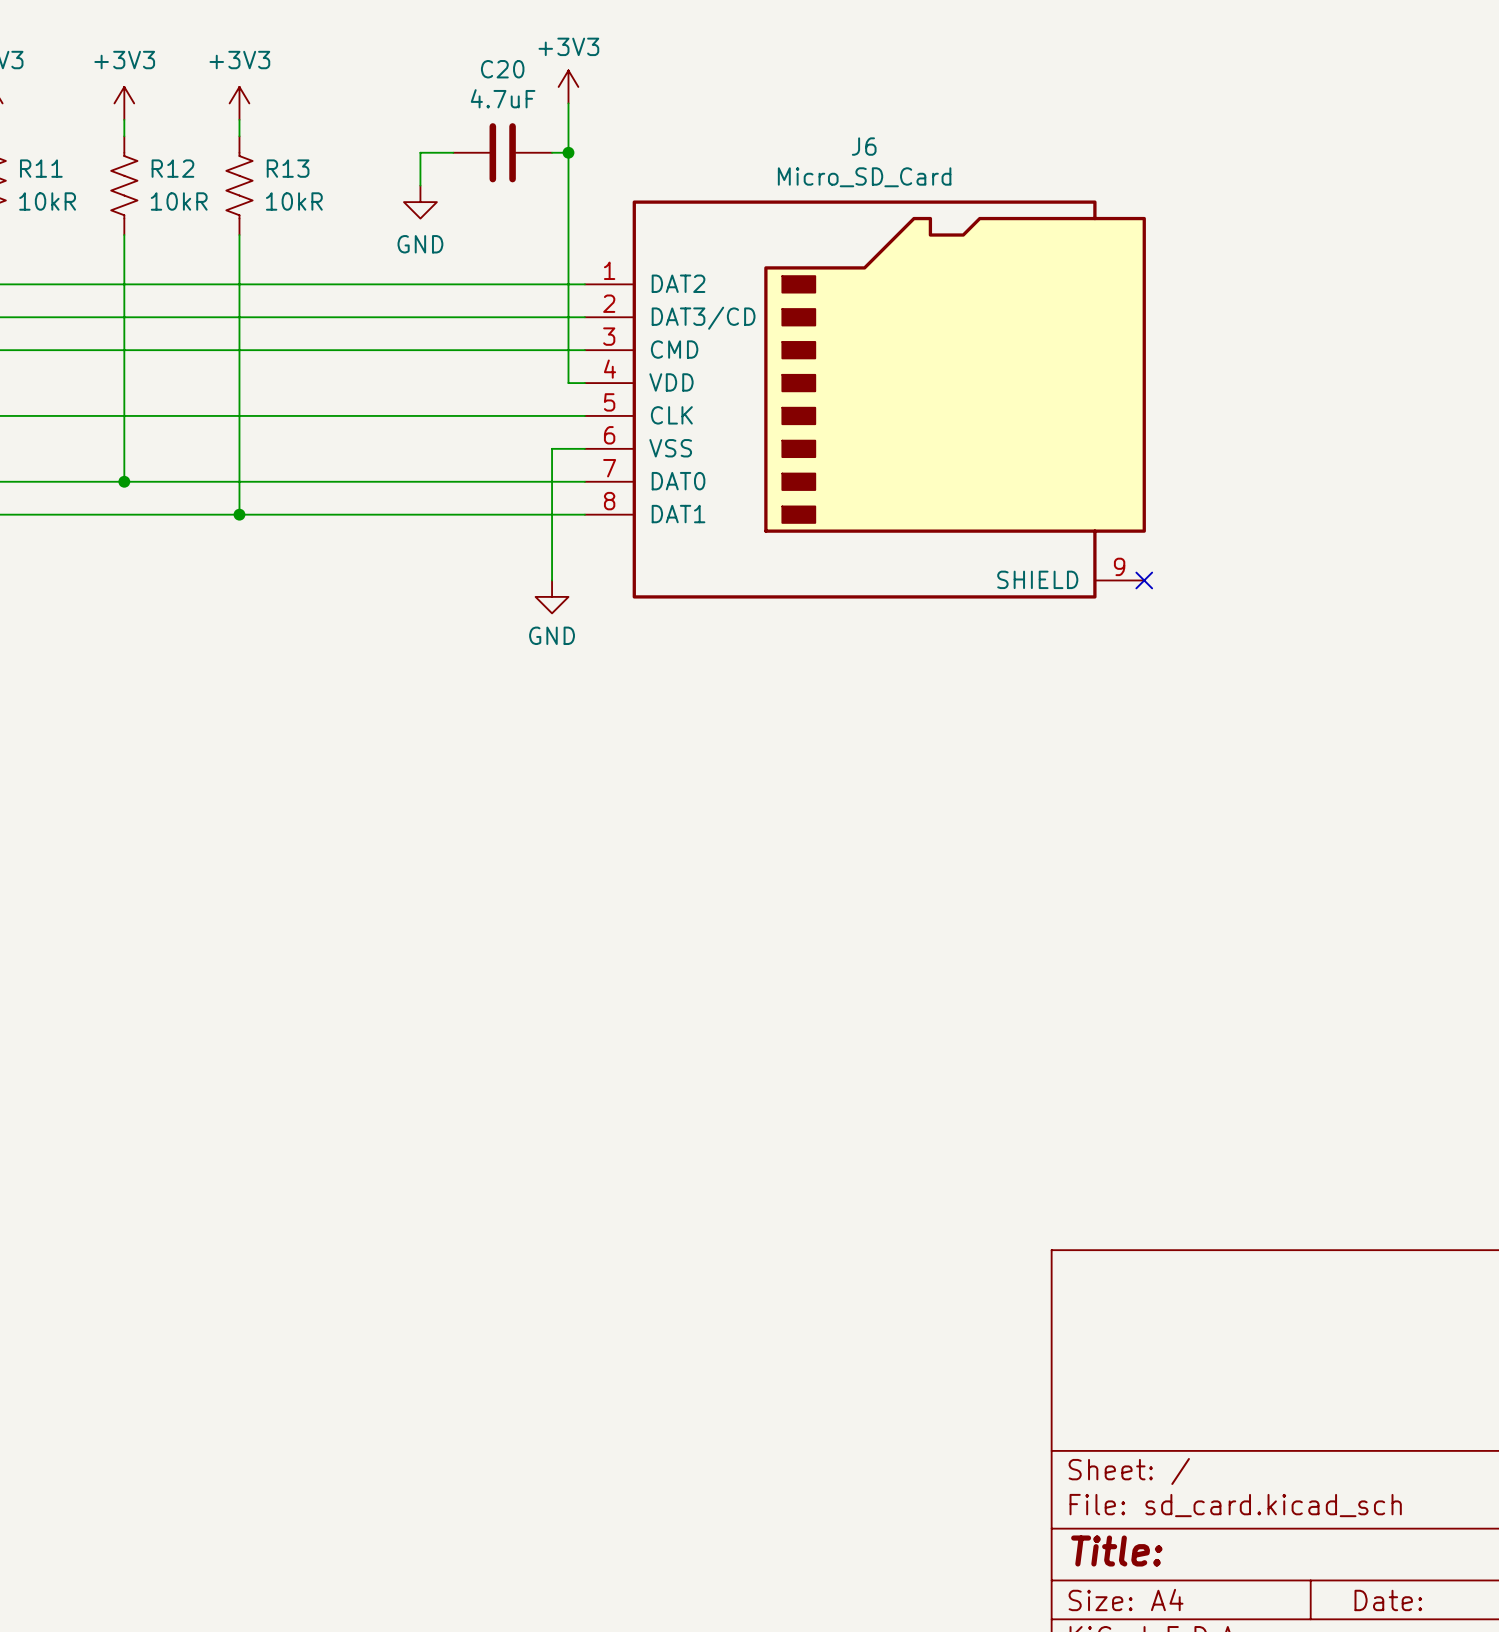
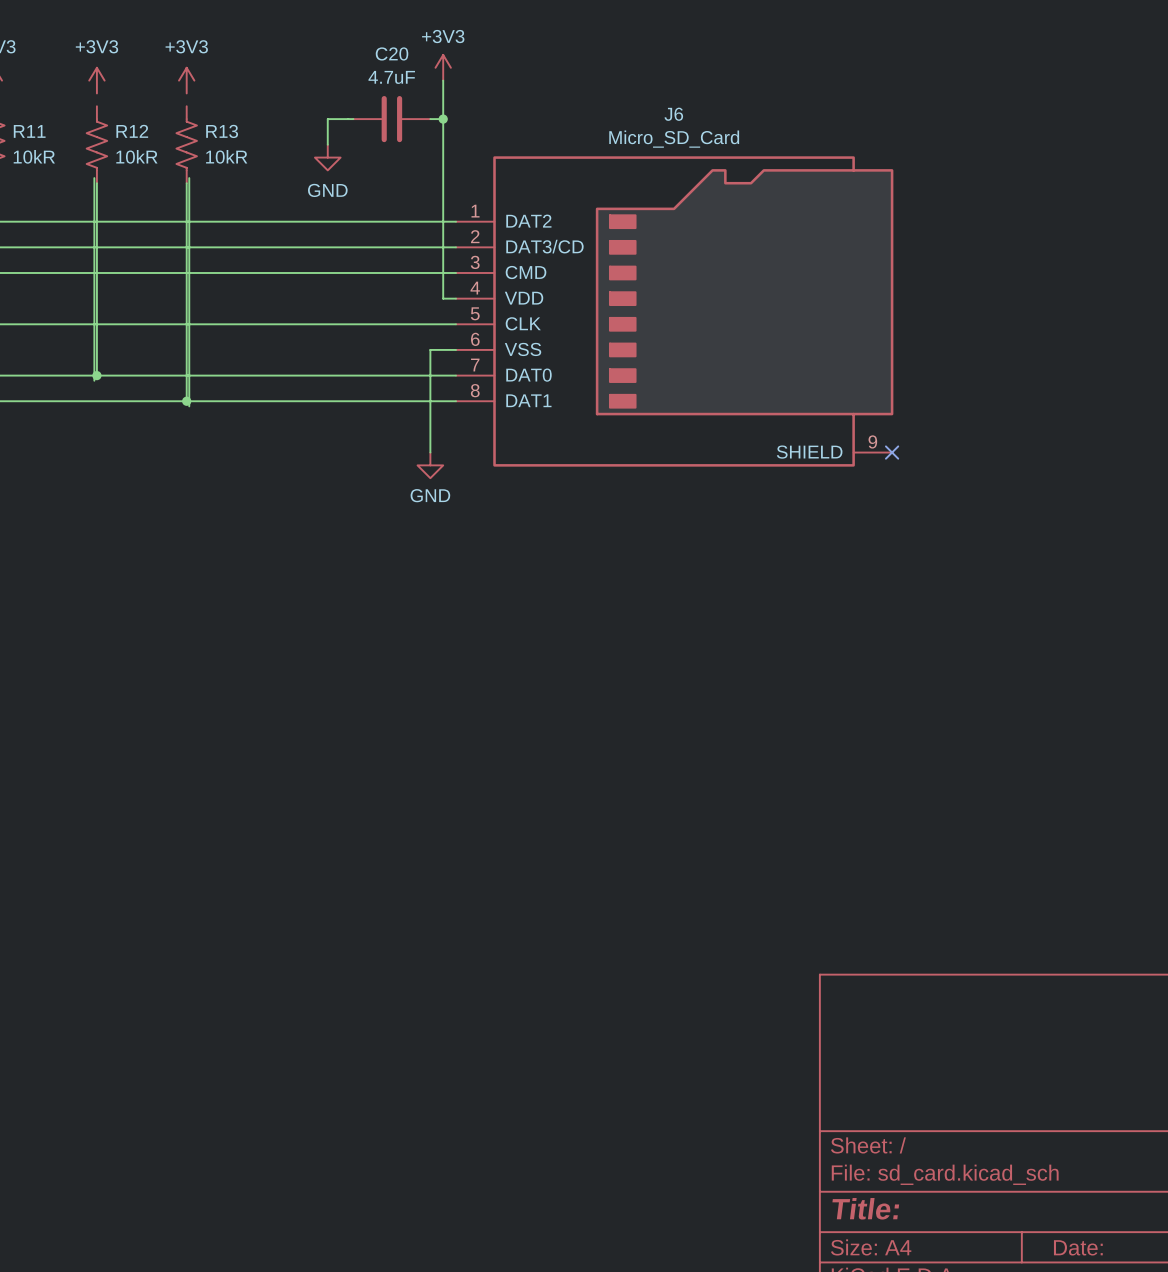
wire: (124, 119) (124, 136) -> none
wire: (239, 119) (239, 136) -> none
wire: none -> (94, 178) (94, 380)
wire: none -> (189, 178) (189, 406)

